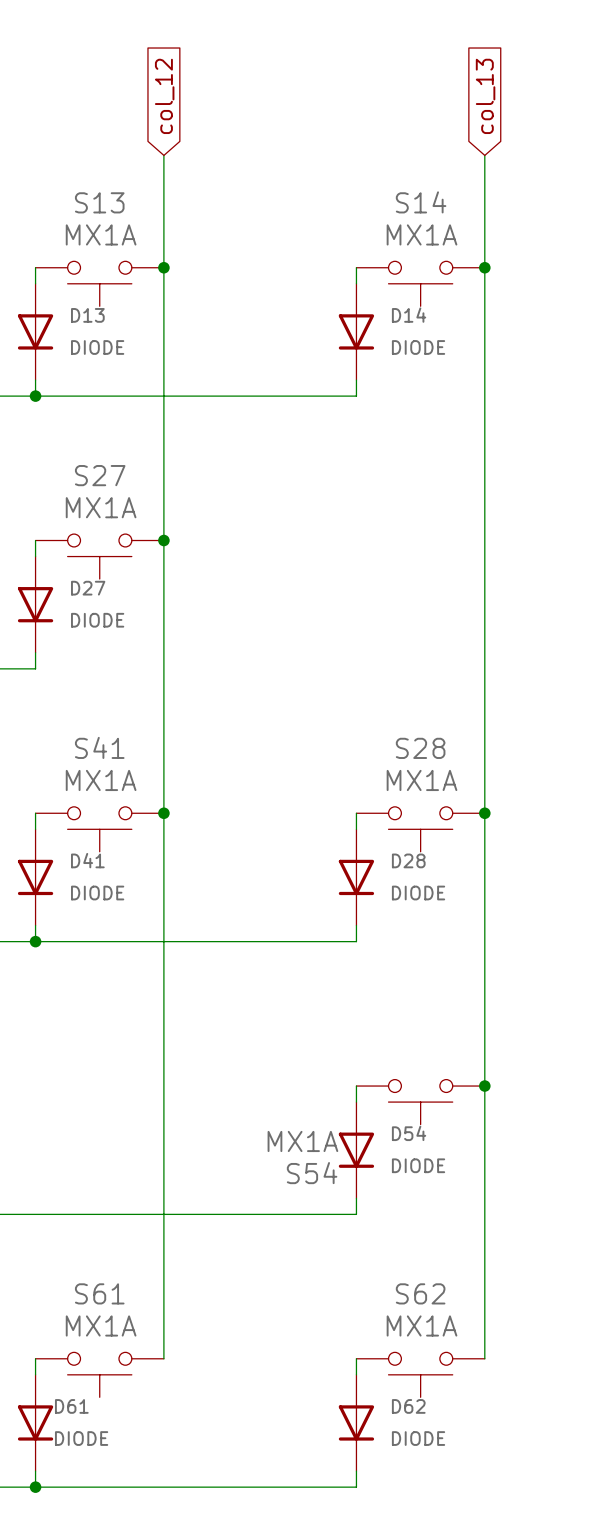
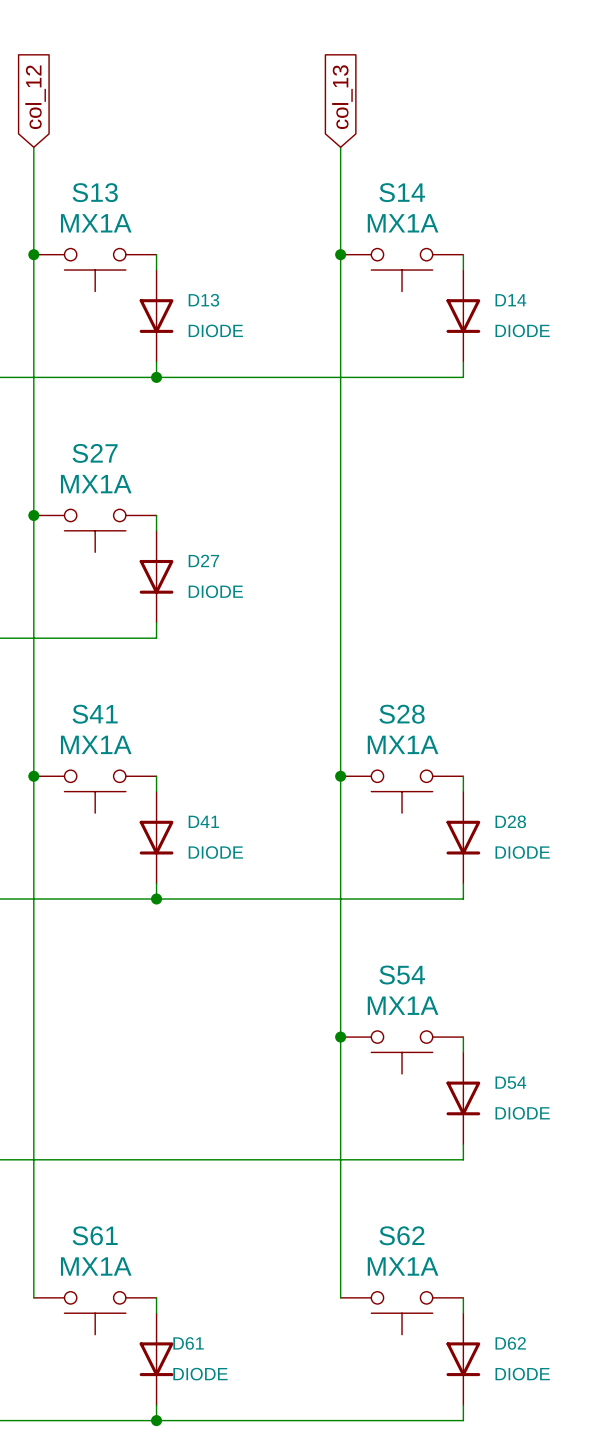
global label position: col_12 (164, 96) -> col_12 (35, 97)
global label position: col_13 (485, 96) -> col_13 (342, 97)
wire: (163, 155) (163, 267) -> (33, 147) (33, 254)
wire: (484, 155) (484, 267) -> (340, 147) (340, 254)
junction: none -> (33, 254)
junction: (163, 267) -> none
junction: none -> (340, 254)
junction: (484, 267) -> none
D13 position: (35, 331) -> (156, 316)
D14 position: (356, 331) -> (463, 316)
junction: (35, 396) -> none
wire: (163, 396) (163, 540) -> (33, 377) (33, 515)
junction: none -> (156, 377)
wire: (484, 396) (484, 813) -> (463, 377) (340, 377) (340, 776)
junction: none -> (33, 515)
junction: (163, 540) -> none
D27 position: (35, 604) -> (156, 576)
wire: (163, 668) (163, 813) -> (156, 638) (33, 638) (33, 776)
junction: none -> (33, 776)
junction: (163, 813) -> none
junction: none -> (340, 776)
junction: (484, 813) -> none
D41 position: (35, 877) -> (156, 837)
D28 position: (356, 877) -> (463, 837)
junction: (35, 941) -> none
wire: (163, 941) (163, 1358) -> (156, 1313) (156, 1297)
junction: none -> (156, 899)
wire: (484, 941) (484, 1086) -> (463, 899) (340, 899) (340, 1037)
junction: none -> (340, 1037)
junction: (484, 1086) -> none
S54 value position: MX1A (302, 1141) -> MX1A (403, 1005)
D54 position: (356, 1150) -> (463, 1098)
S54 name position: S54 (312, 1173) -> S54 (402, 975)
wire: (484, 1214) (484, 1358) -> (463, 1159) (340, 1159) (340, 1297)
wire: (35, 1358) (35, 1374) -> (33, 1297) (33, 899)
wire: (356, 1358) (356, 1374) -> (463, 1297) (463, 1313)
D61 position: (35, 1422) -> (156, 1359)
D62 position: (356, 1422) -> (463, 1359)
wire: (35, 1471) (35, 1487) -> (156, 1405) (156, 1420)
wire: (356, 1471) (356, 1487) -> (463, 1405) (463, 1420) (340, 1420)
junction: (35, 1487) -> none
junction: none -> (156, 1420)

